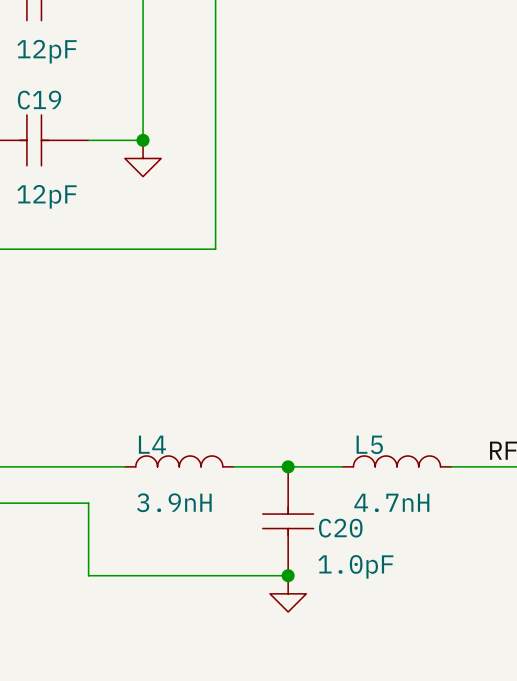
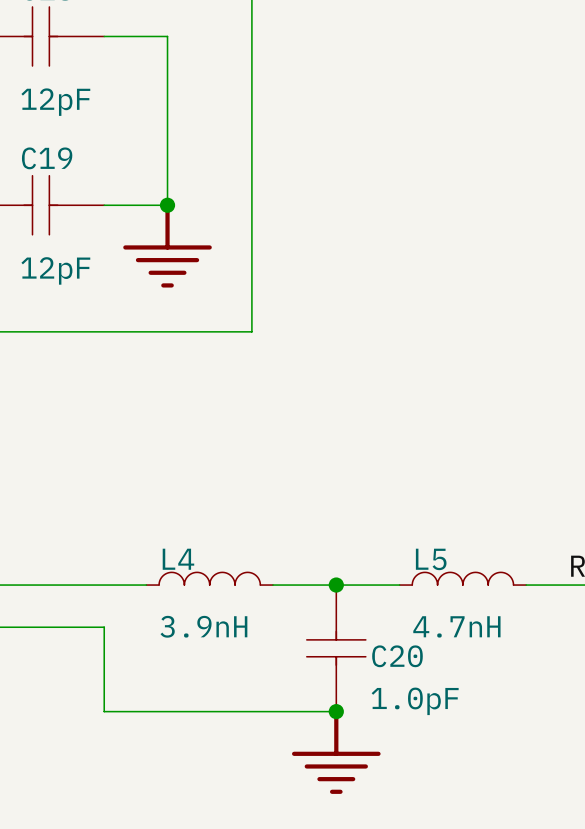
power symbol: (143, 158) -> none
power symbol: none -> (167, 245)
power symbol: (288, 593) -> none
power symbol: none -> (336, 751)

